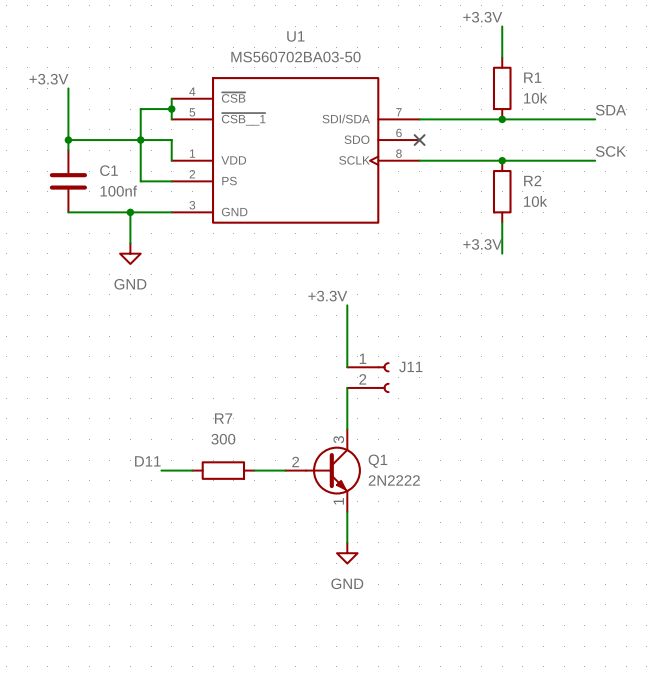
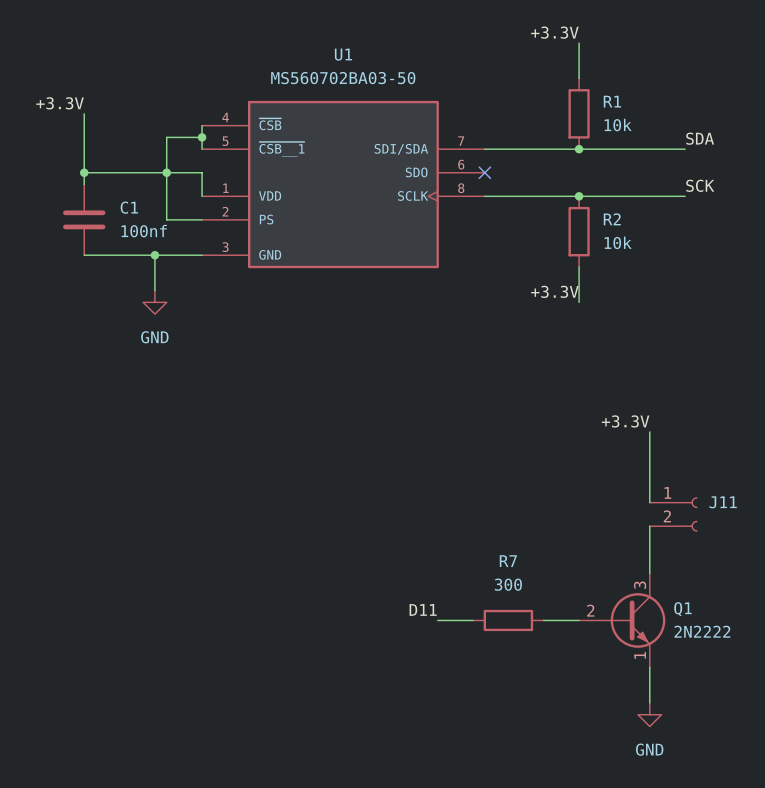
label: +3.3V (327, 296) -> none
wire: (347, 305) (347, 367) -> none
label: none -> +3.3V (625, 421)
wire: none -> (649, 431) (649, 502)
J11 position: (368, 377) -> (673, 514)
wire: (347, 387) (347, 429) -> none
wire: none -> (649, 526) (649, 573)
label: D11 (147, 461) -> none
wire: (161, 470) (192, 470) -> none
R7 position: (223, 470) -> (508, 620)
wire: (254, 470) (285, 470) -> (437, 620) (473, 620)
Q1 position: (323, 470) -> (622, 620)
wire: (347, 511) (347, 542) -> none
label: none -> D11 (423, 609)
wire: none -> (543, 620) (579, 620)
power symbol: GND (347, 553) -> none
wire: none -> (649, 667) (649, 702)
power symbol: none -> GND (649, 714)

